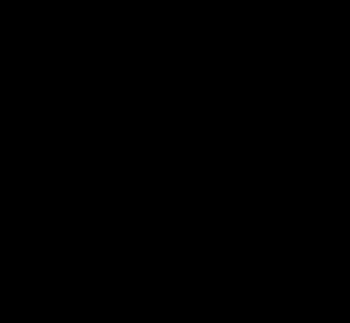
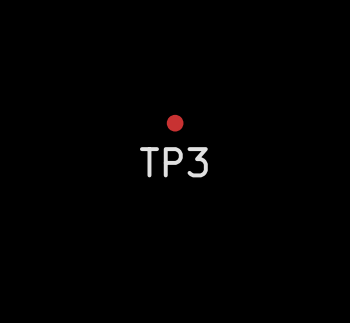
TP3: none -> (175, 123)

